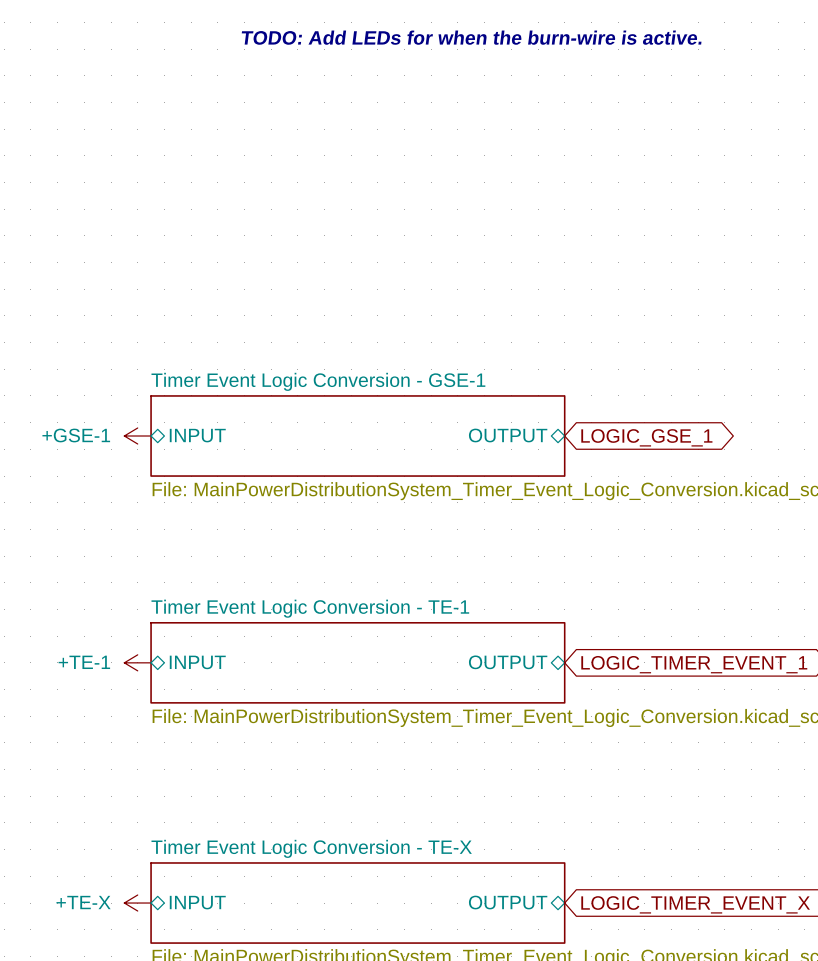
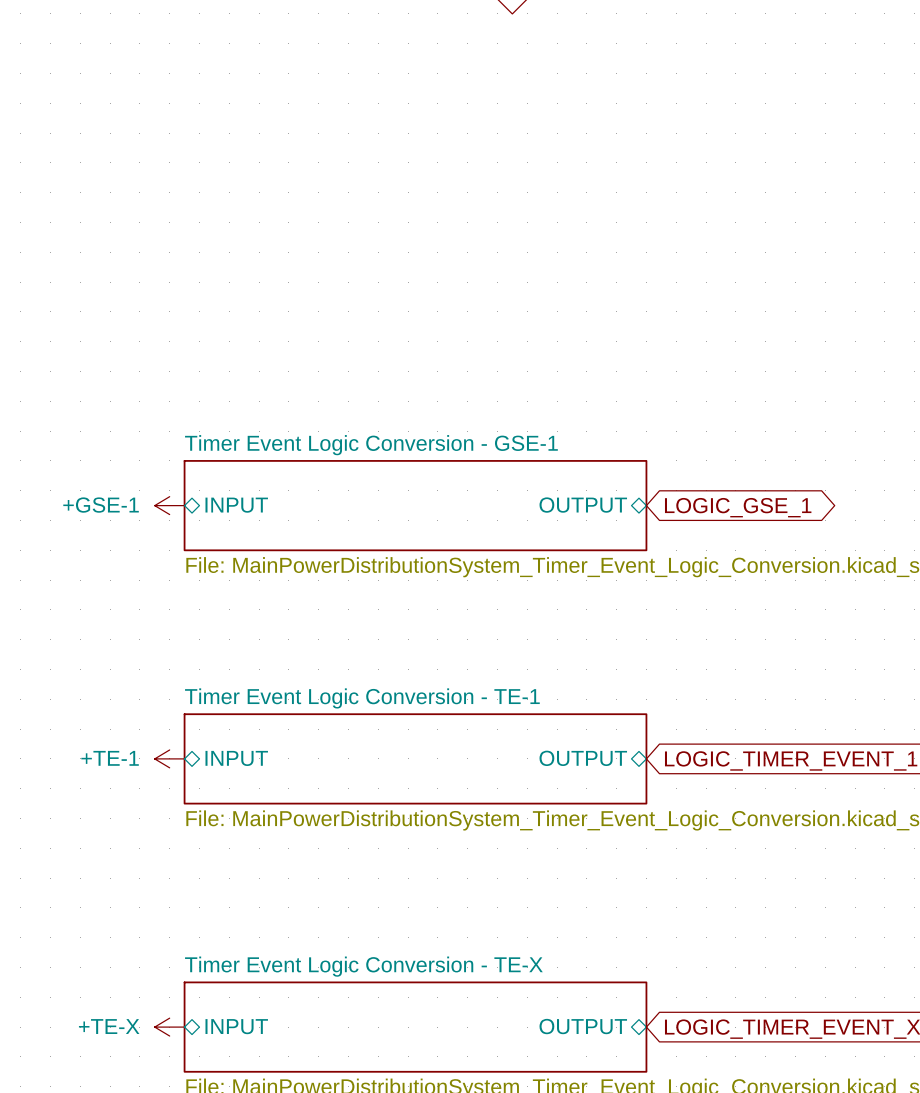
text: TODO: Add LEDs for when the burn-wire is active. (471, 37) -> none

